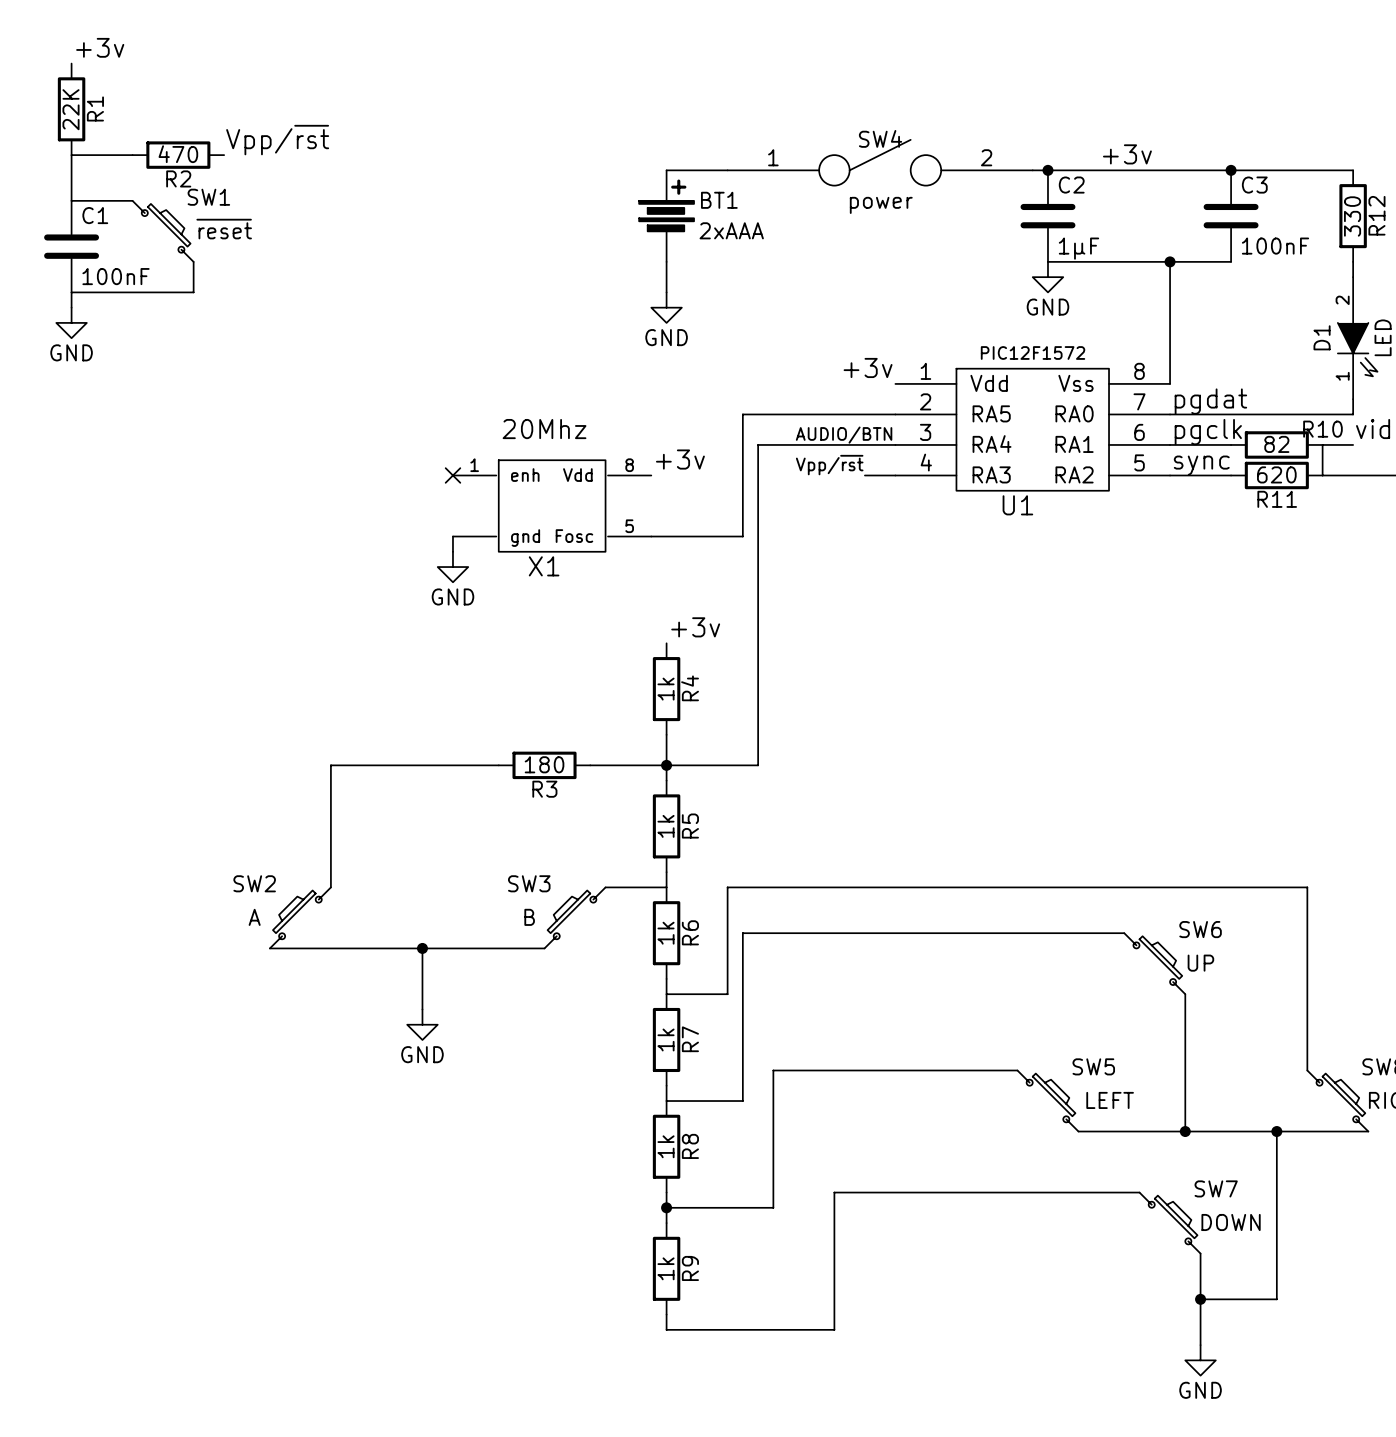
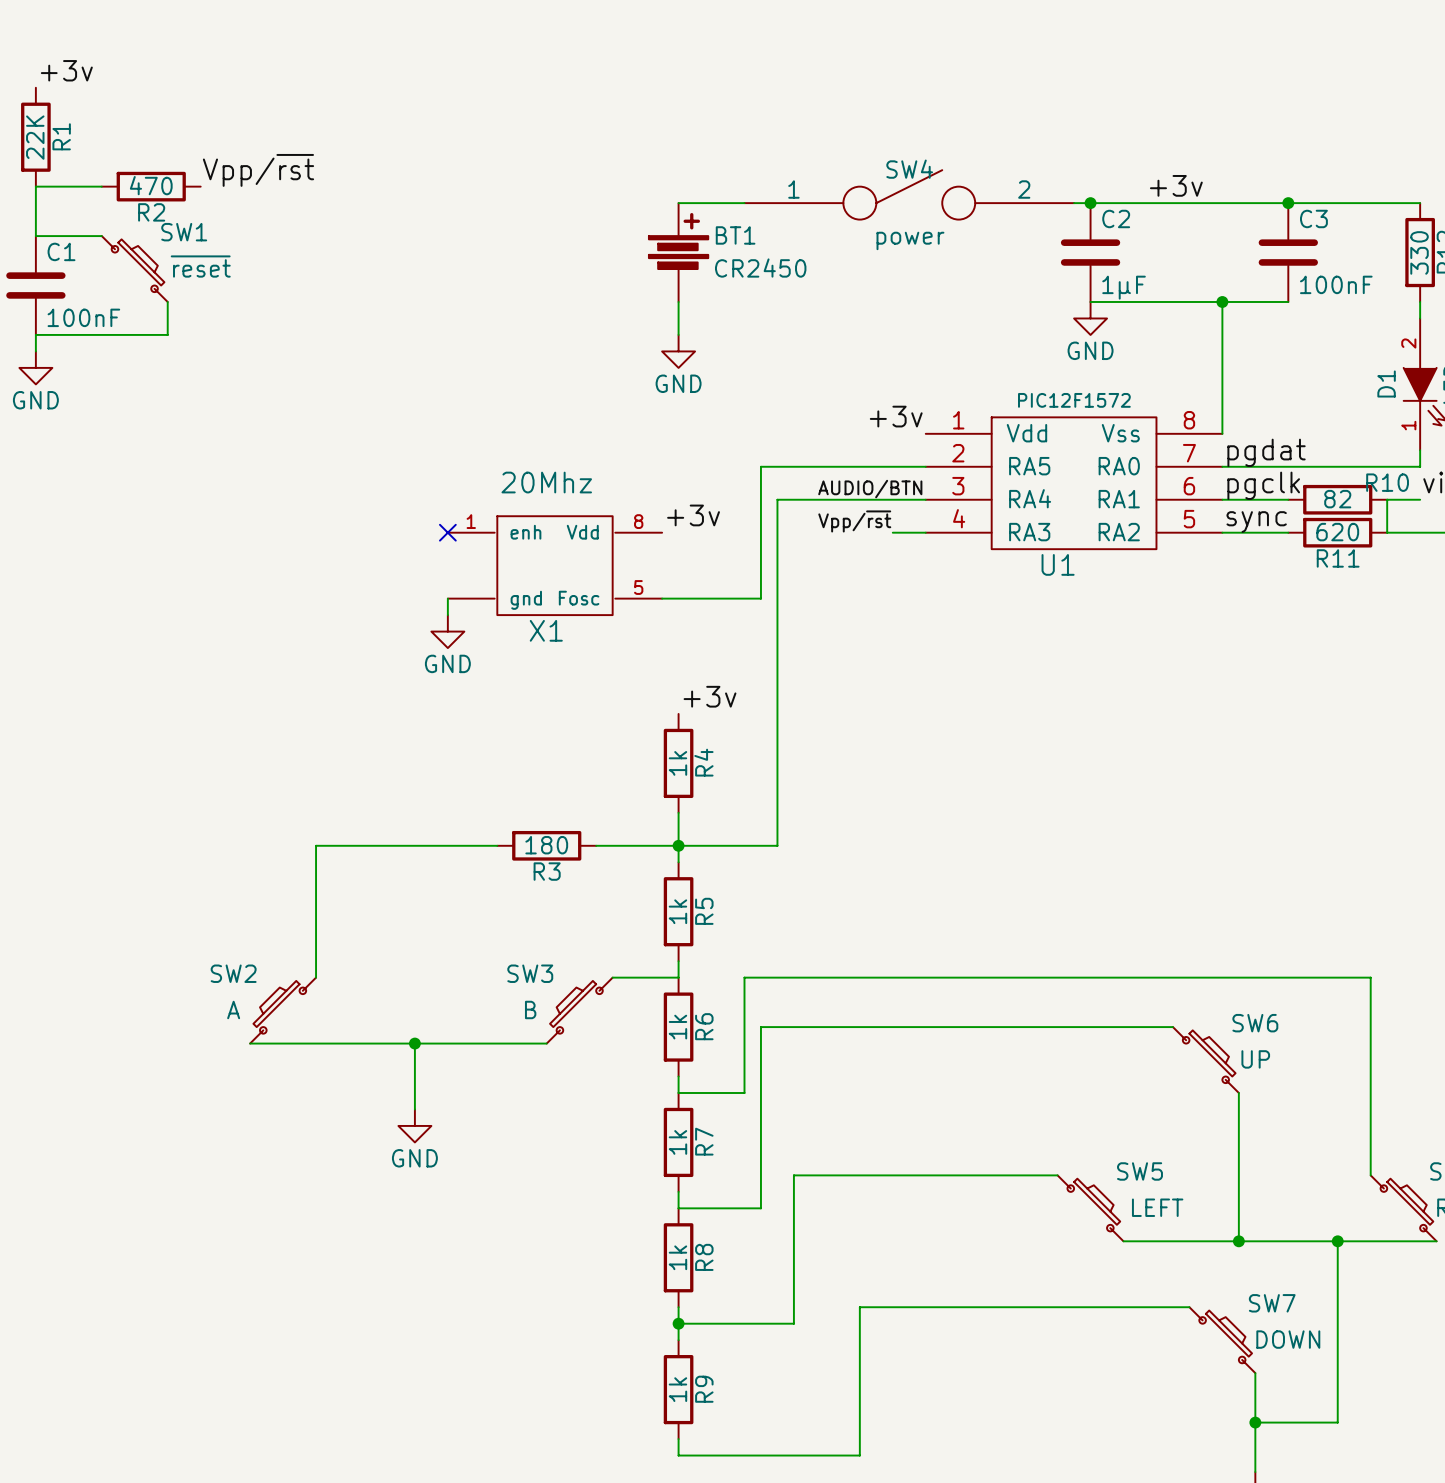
BT1 value: 2xAAA (731, 230) -> CR2450 (760, 268)

